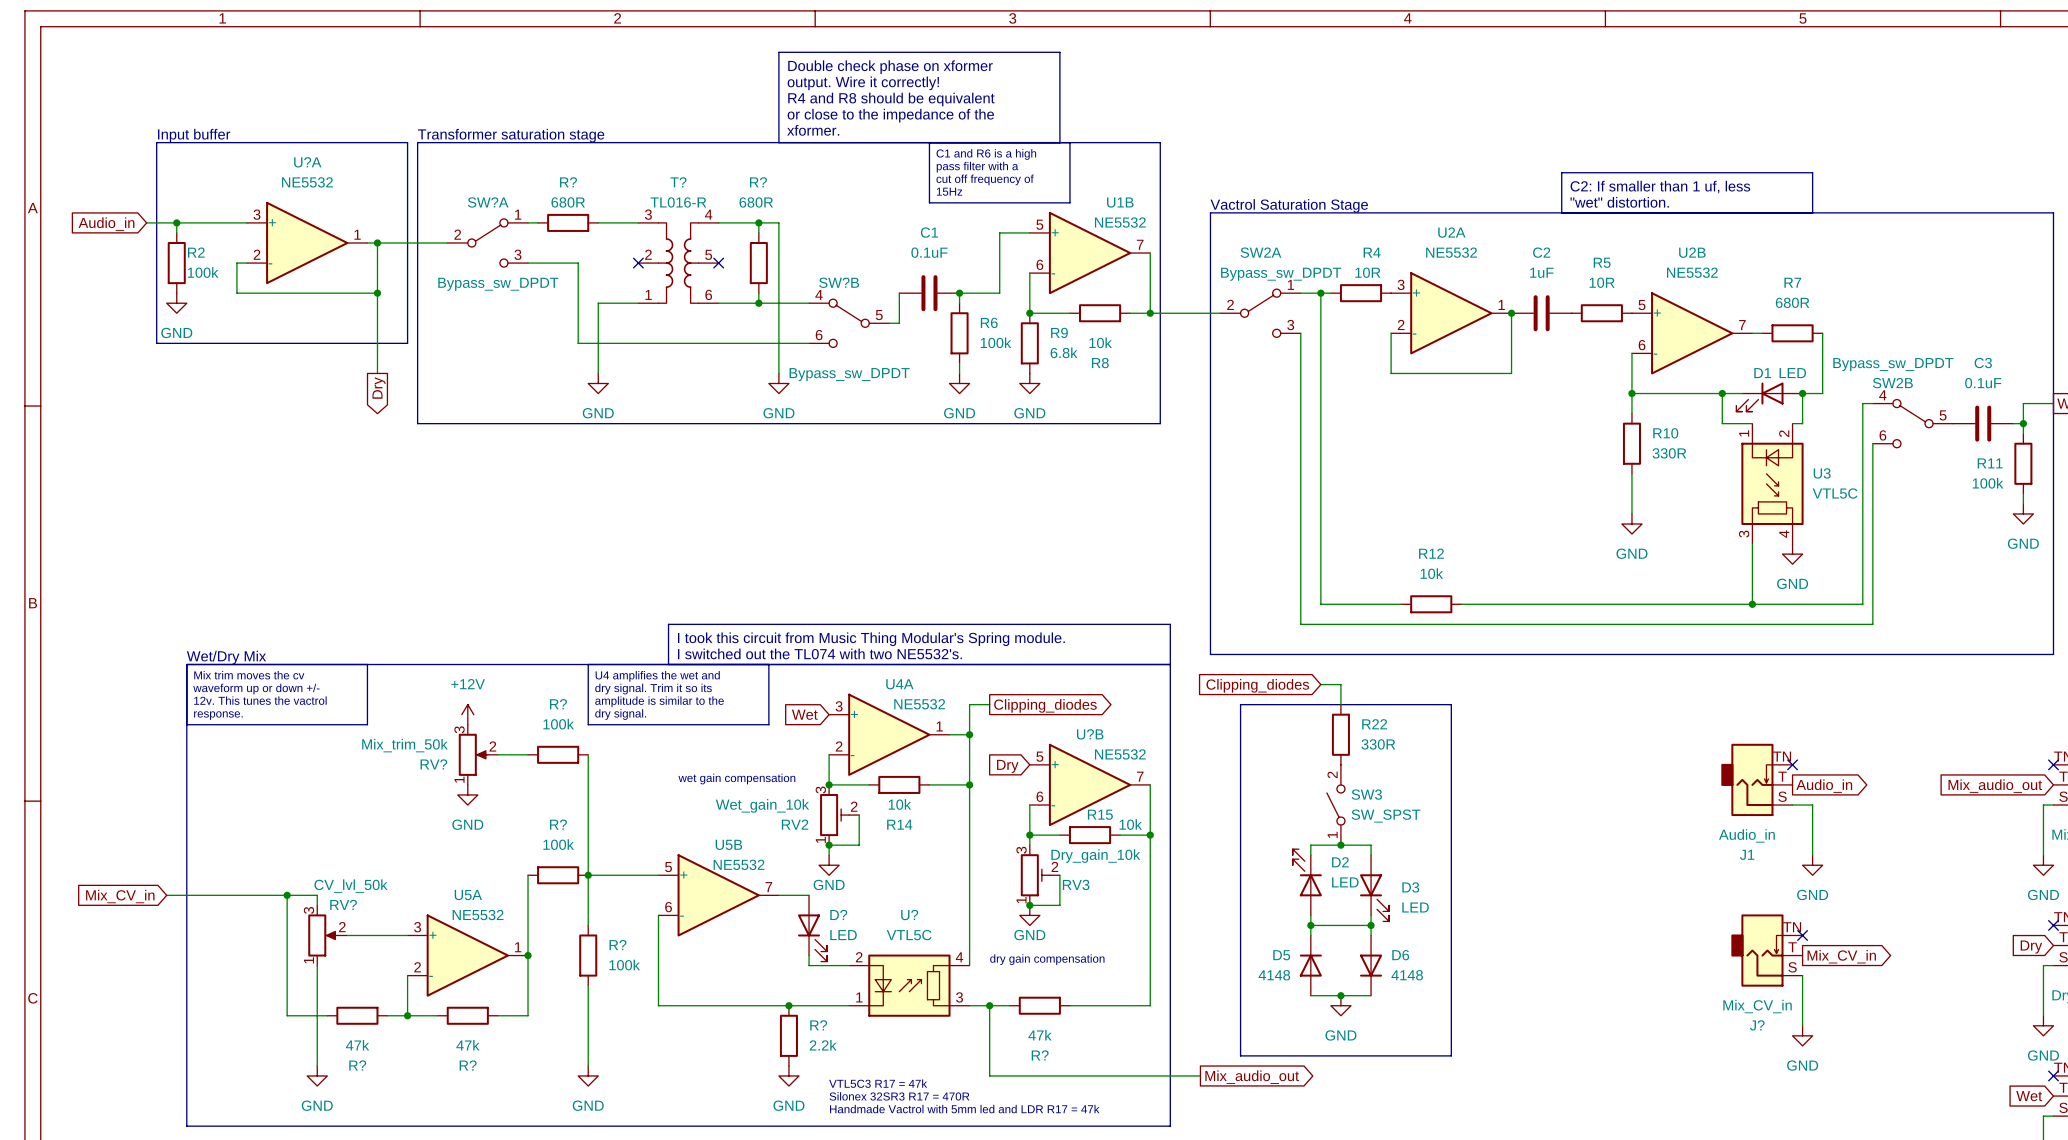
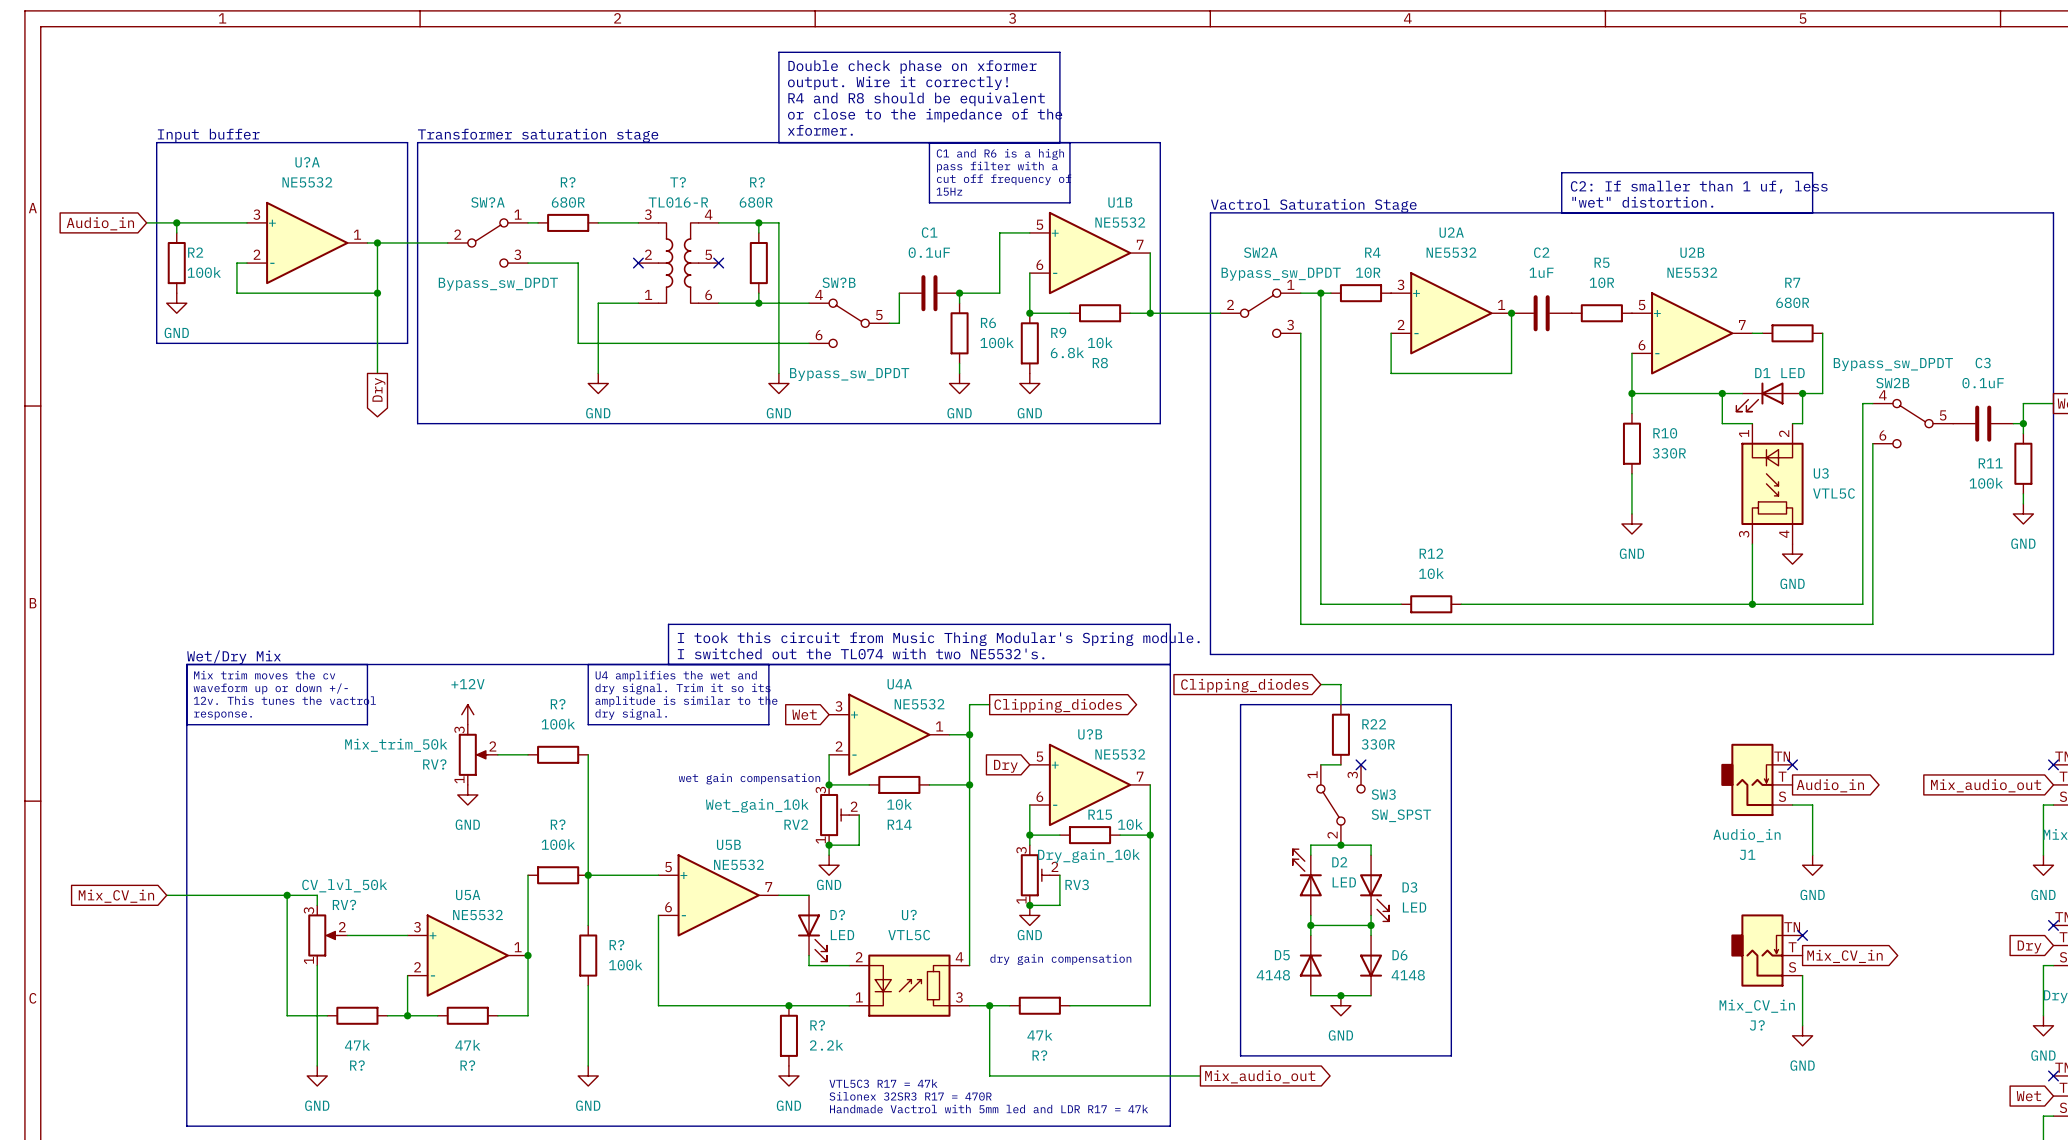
wire: none -> (1320, 764) (1340, 764)
SW3 symbol: [1326, 764, 1345, 846] -> [1316, 764, 1366, 846]
no-connect mark: none -> (1361, 764)

